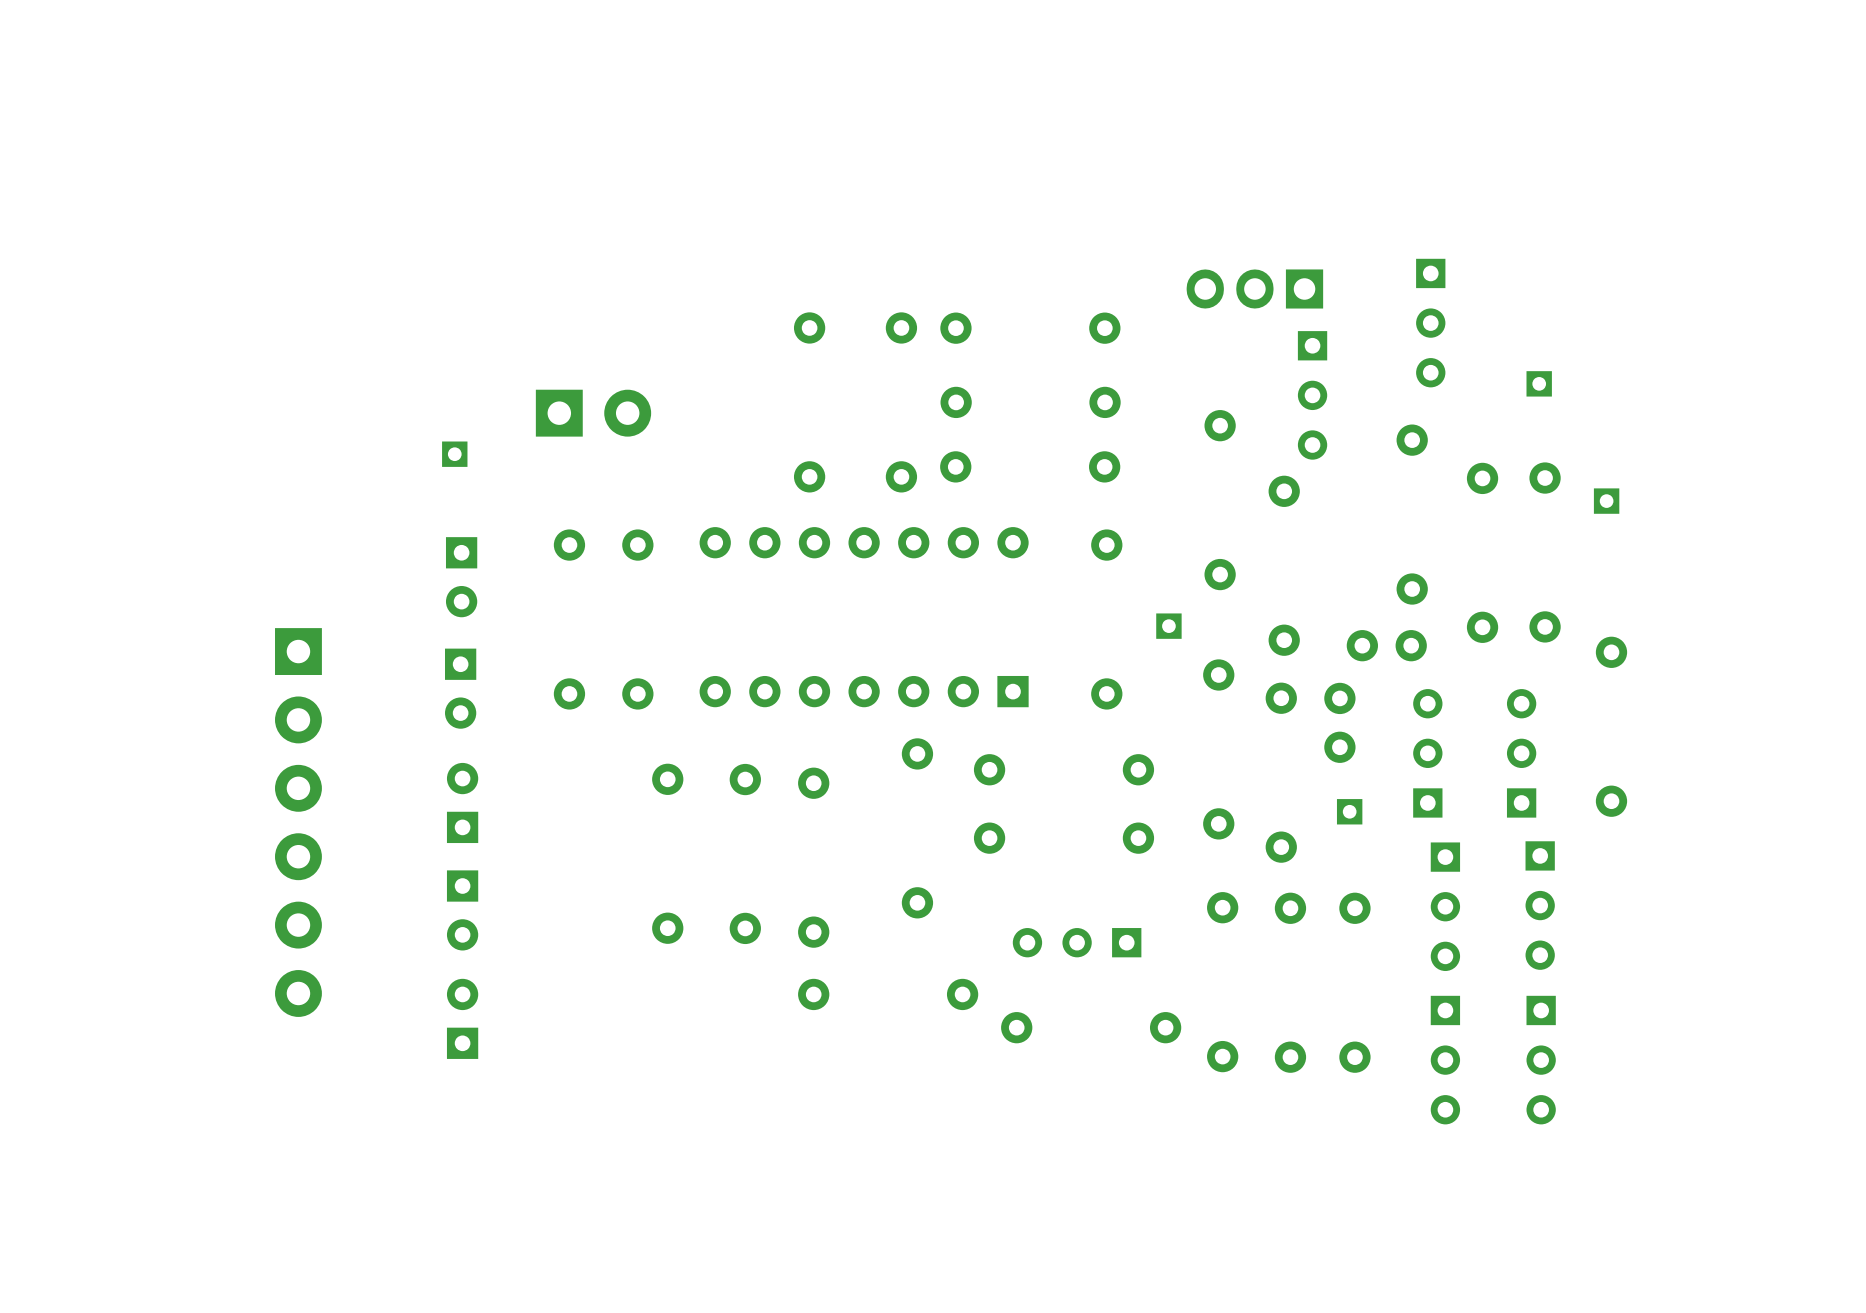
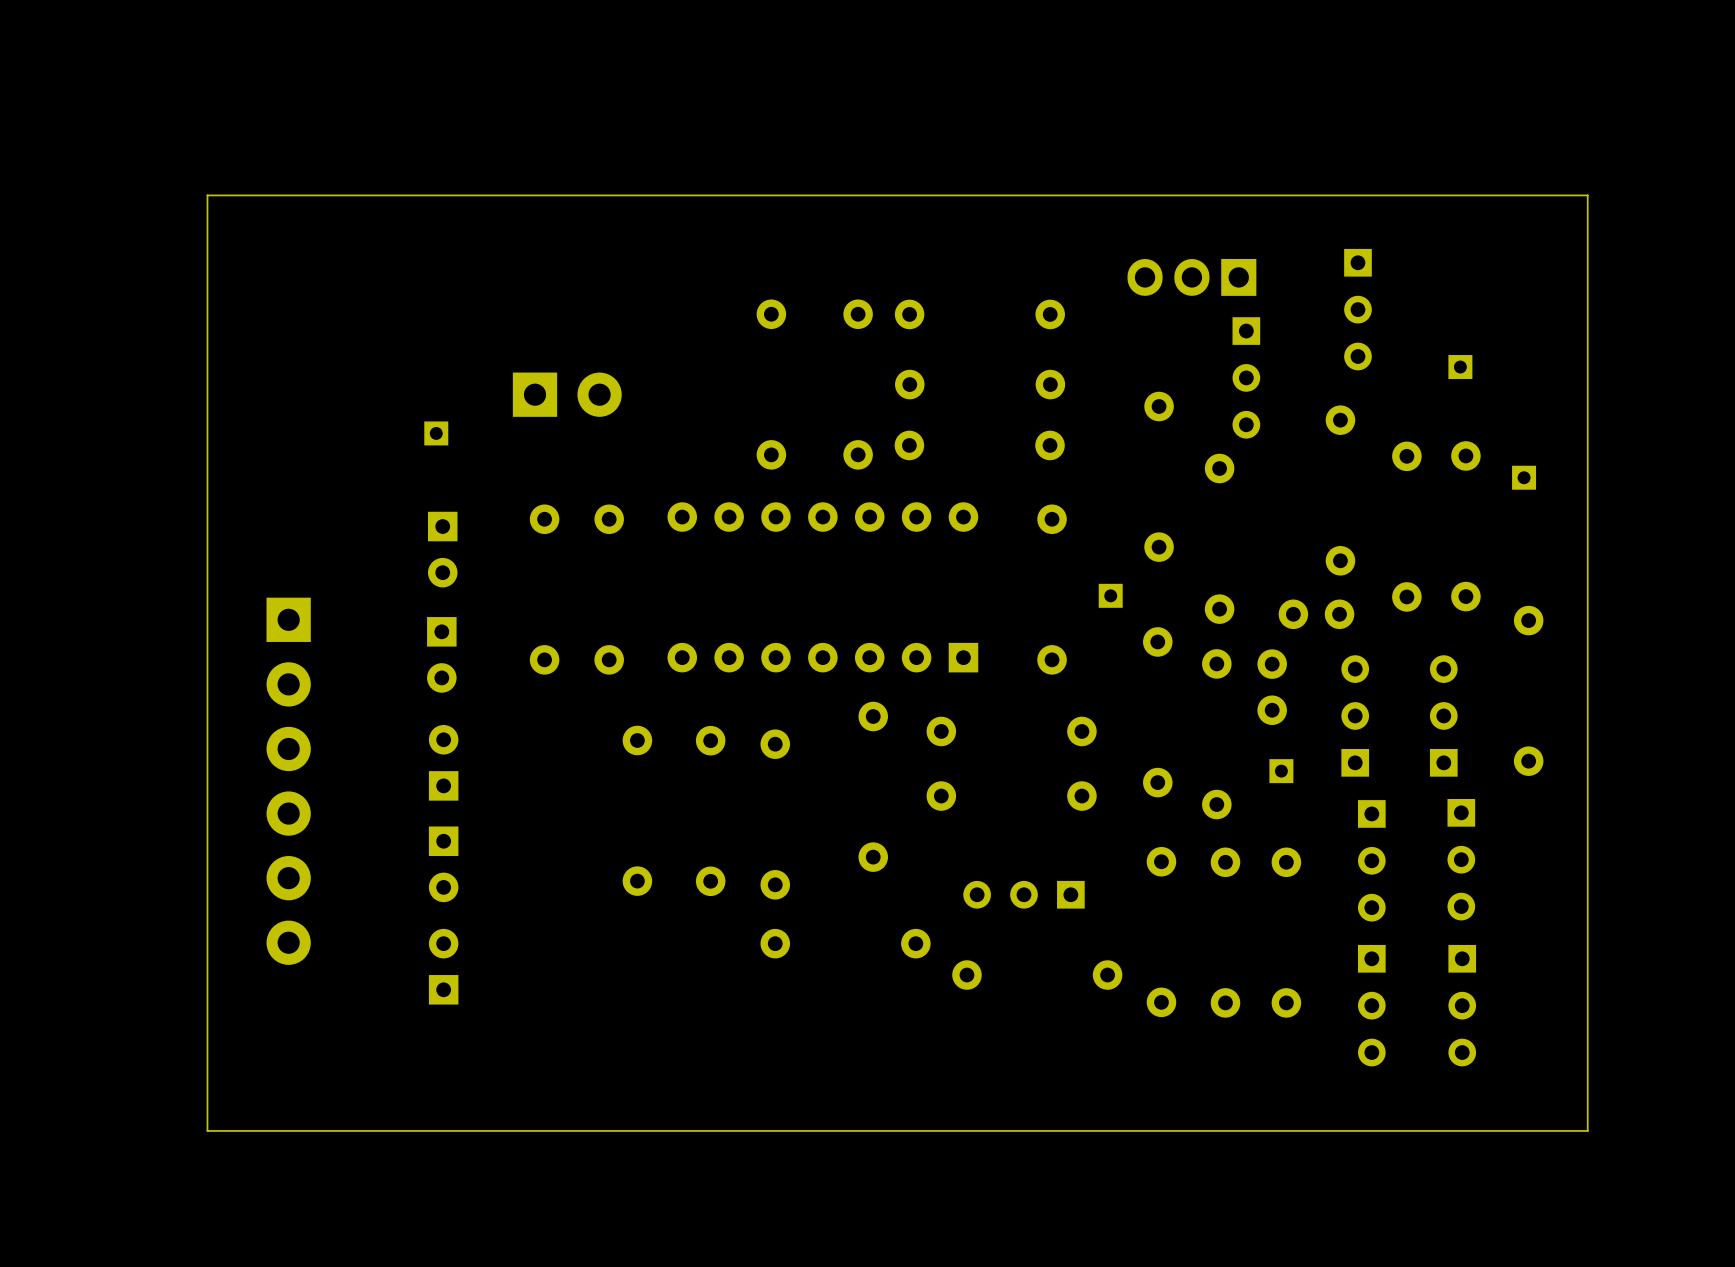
board edge: none -> (1587, 195) (207, 195) (207, 1130) (1587, 1130) (1587, 195)

